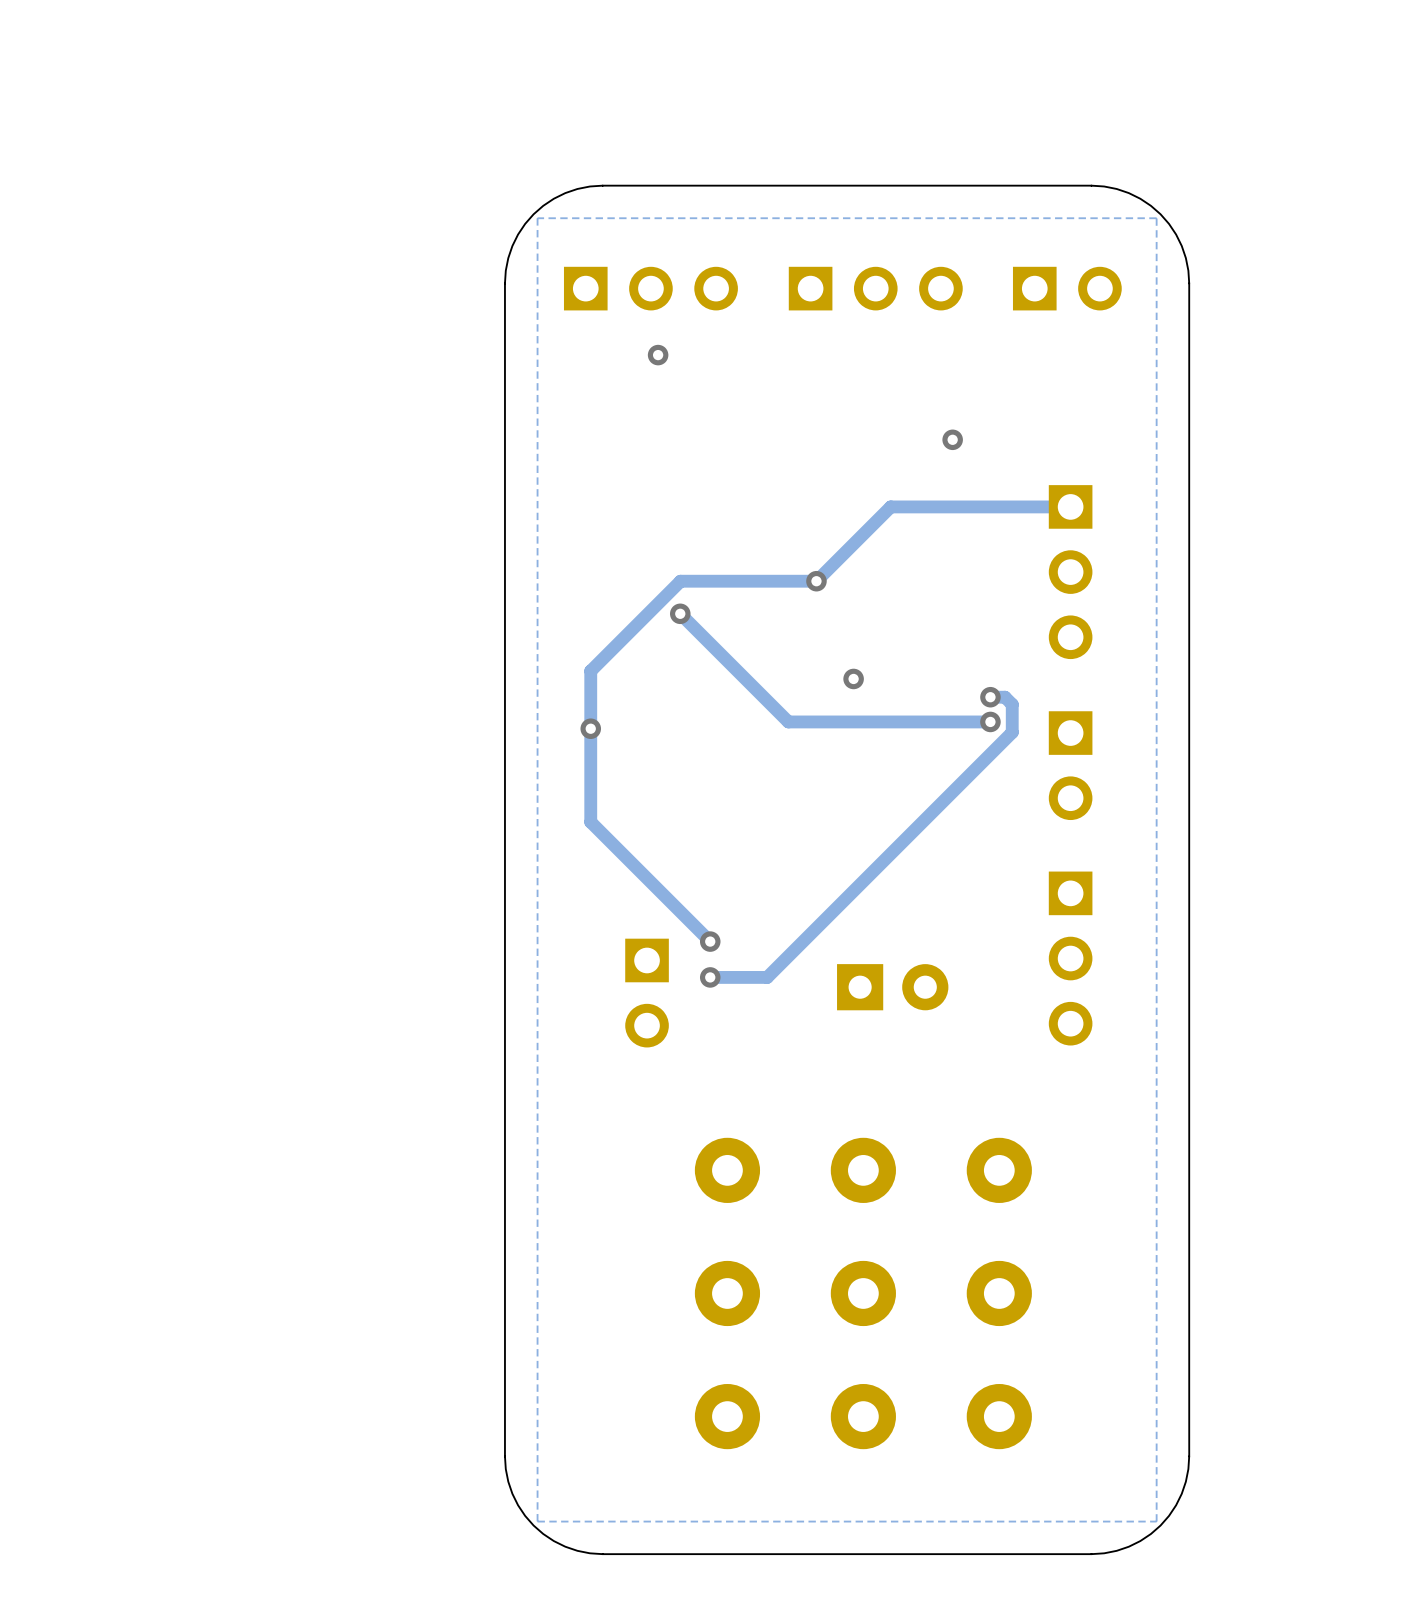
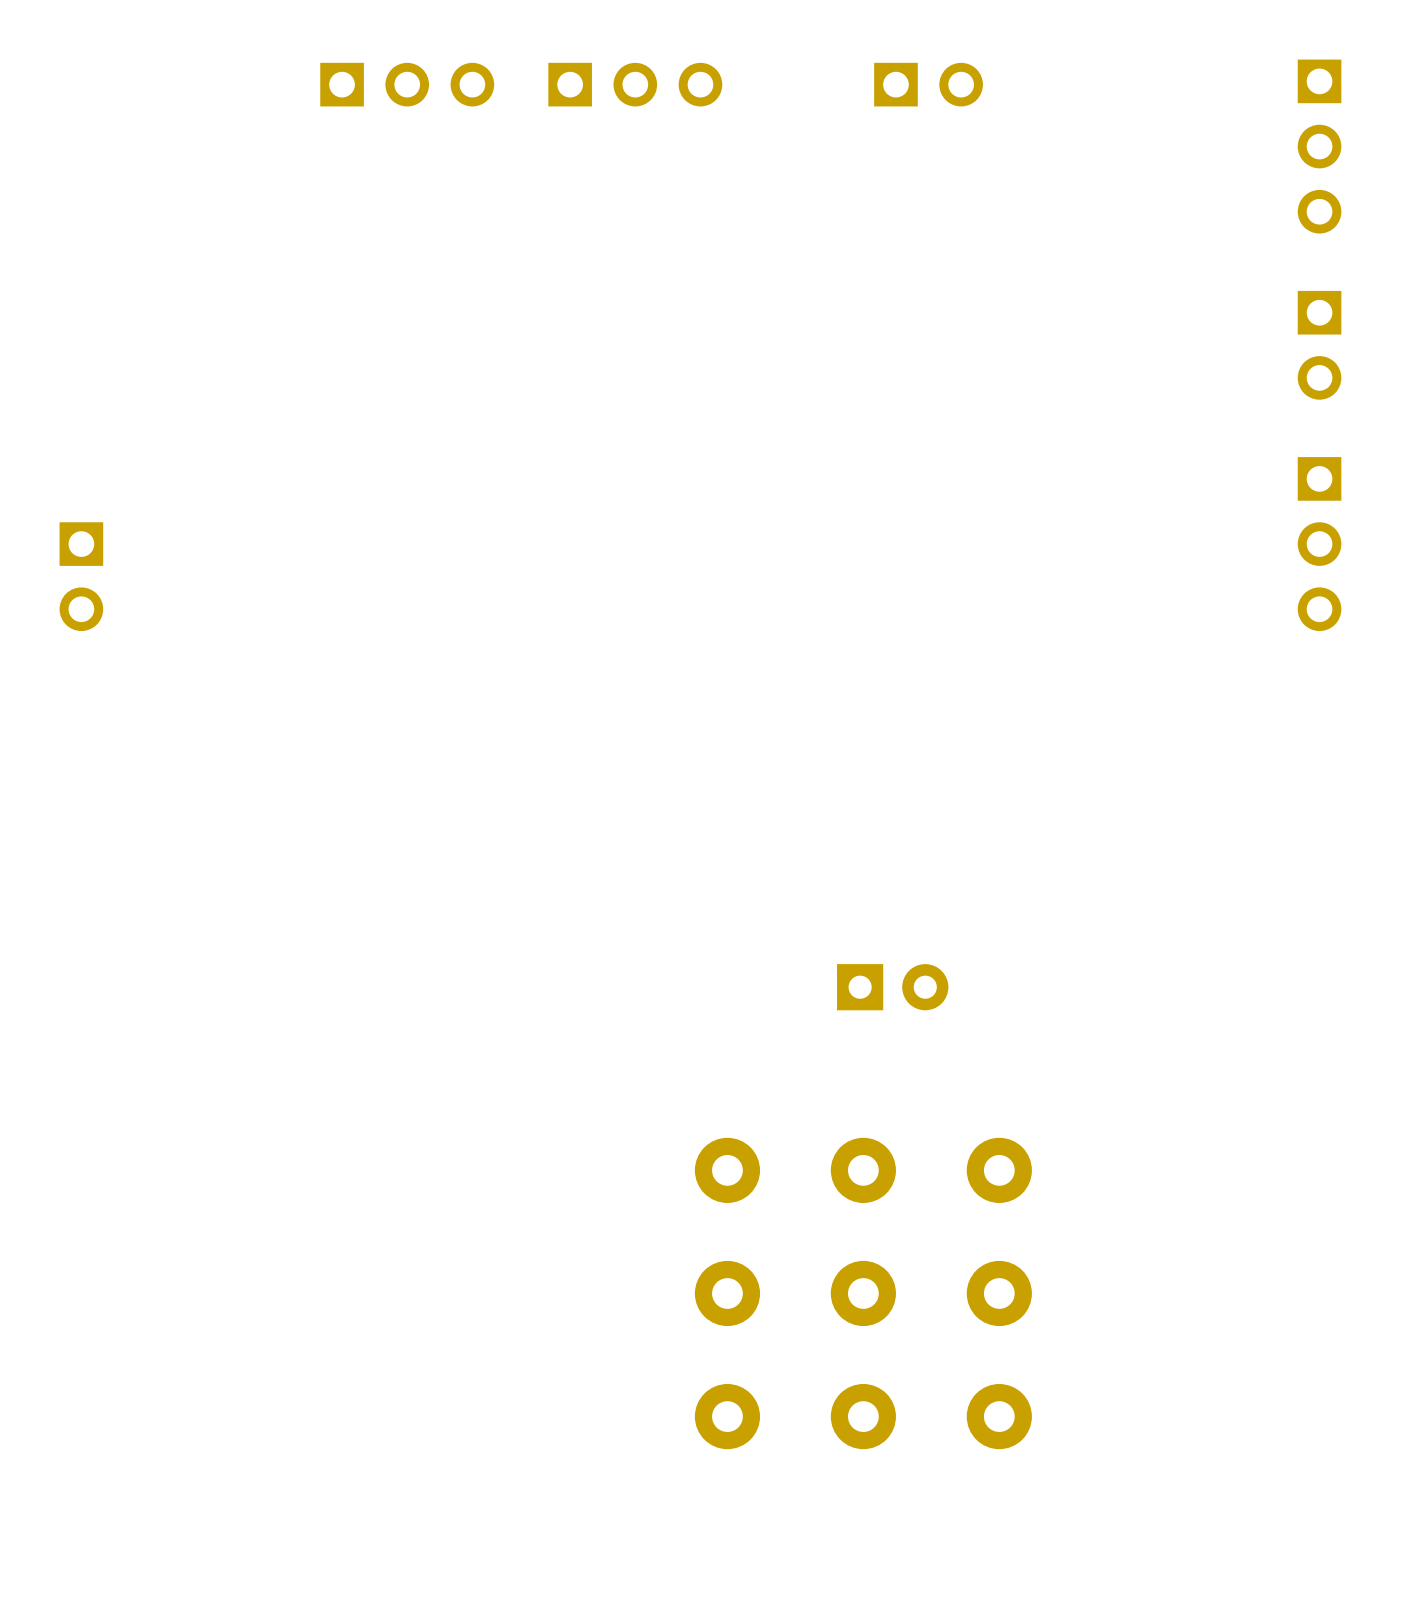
part: none -> (407, 84)
part: none -> (635, 84)
part: none -> (928, 84)
part: none -> (1319, 146)
board edge: (1091, 185) (589, 186) (565, 193) (543, 205) (525, 223) (512, 246) (505, 270) (504, 283) (504, 1456) (508, 1481) (518, 1505) (533, 1525) (553, 1541) (565, 1546) (589, 1553) (602, 1554) (1104, 1553) (1128, 1546) (1150, 1533) (1169, 1515) (1181, 1493) (1188, 1469) (1189, 1456) (1188, 270) (1185, 258) (1176, 234) (1160, 214) (1150, 205) (1128, 193) (1104, 186) (1091, 185) -> none
zone outline: (1156, 218) (1156, 1521) (537, 1521) (537, 218) (1156, 218) -> none
part: (650, 288) -> none
part: (875, 288) -> none
part: (1067, 288) -> none
part: none -> (1319, 345)
via: (658, 355) -> none
via: (952, 439) -> none
track: (1070, 506) (890, 506) (816, 581) (680, 581) (590, 671) (590, 822) (710, 941) -> none
part: none -> (1319, 544)
part: (1070, 572) -> none
part: none -> (81, 576)
via: (816, 581) -> none
track: (680, 613) (788, 721) (990, 721) -> none
via: (680, 613) -> none
via: (853, 678) -> none
track: (990, 697) (1004, 697) (1012, 704) (1012, 732) (767, 977) (710, 977) -> none
via: (990, 697) -> none
via: (990, 721) -> none
via: (590, 728) -> none
part: (1070, 765) -> none
via: (710, 941) -> none
part: (1070, 958) -> none
via: (710, 977) -> none
part: (647, 993) -> none

